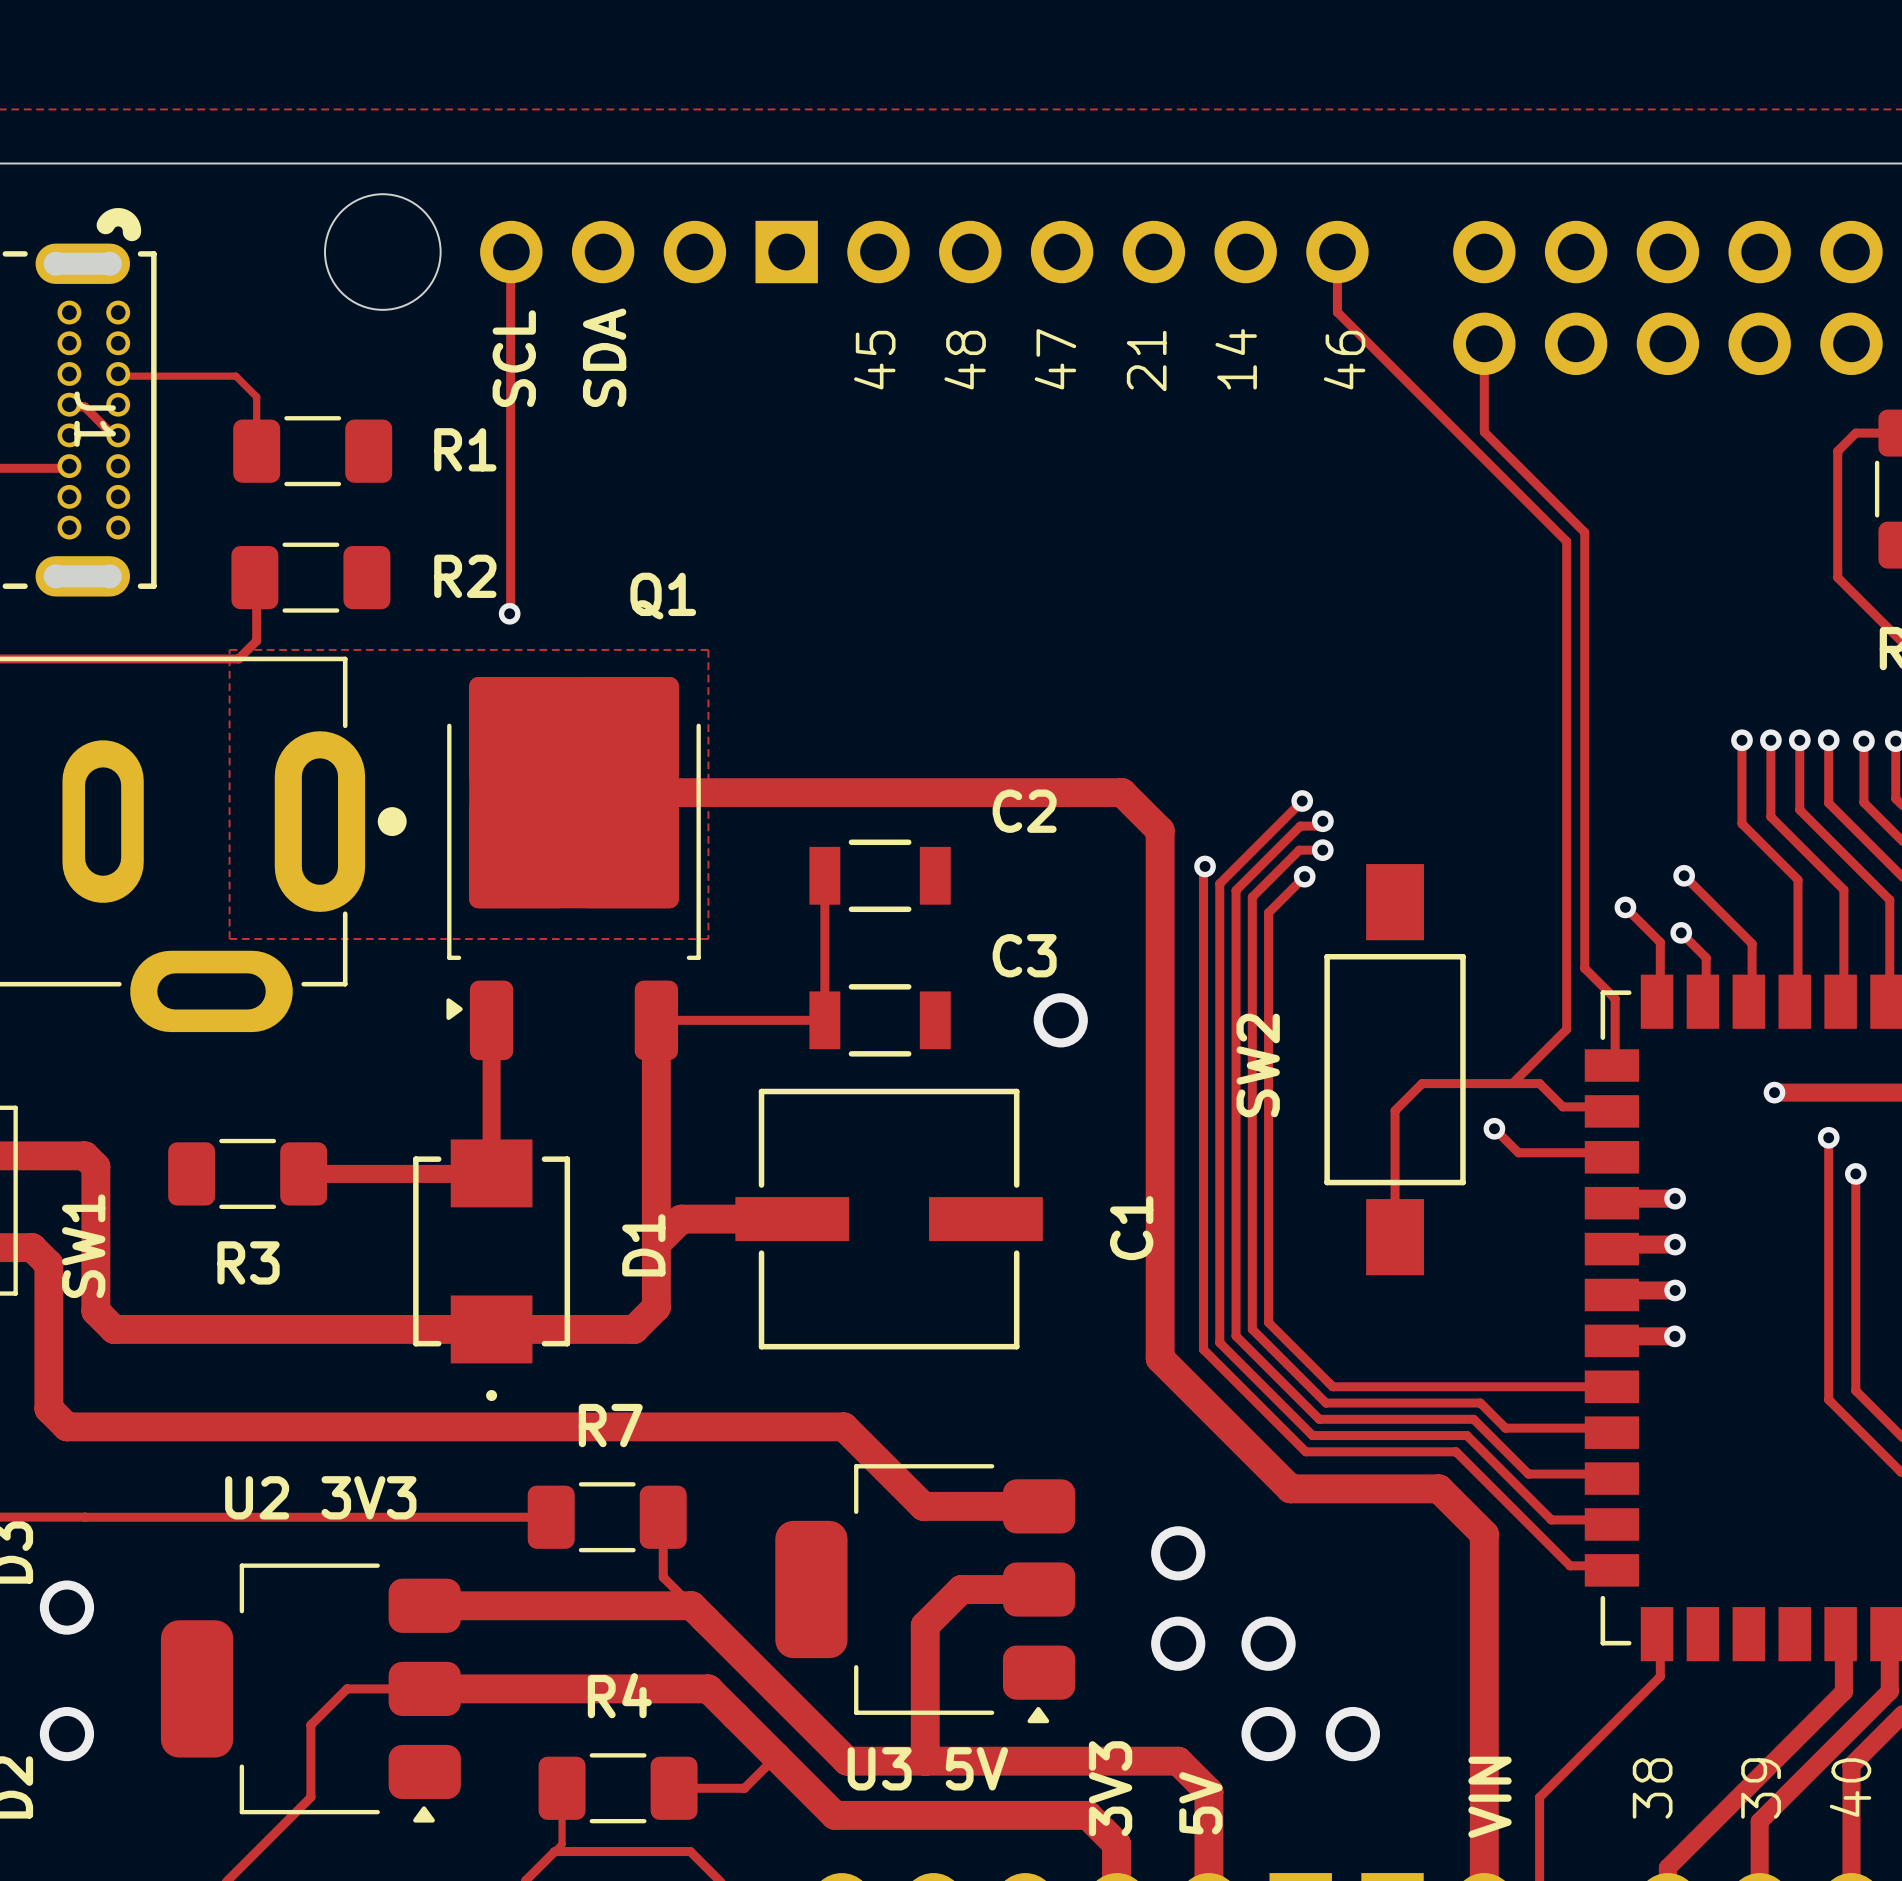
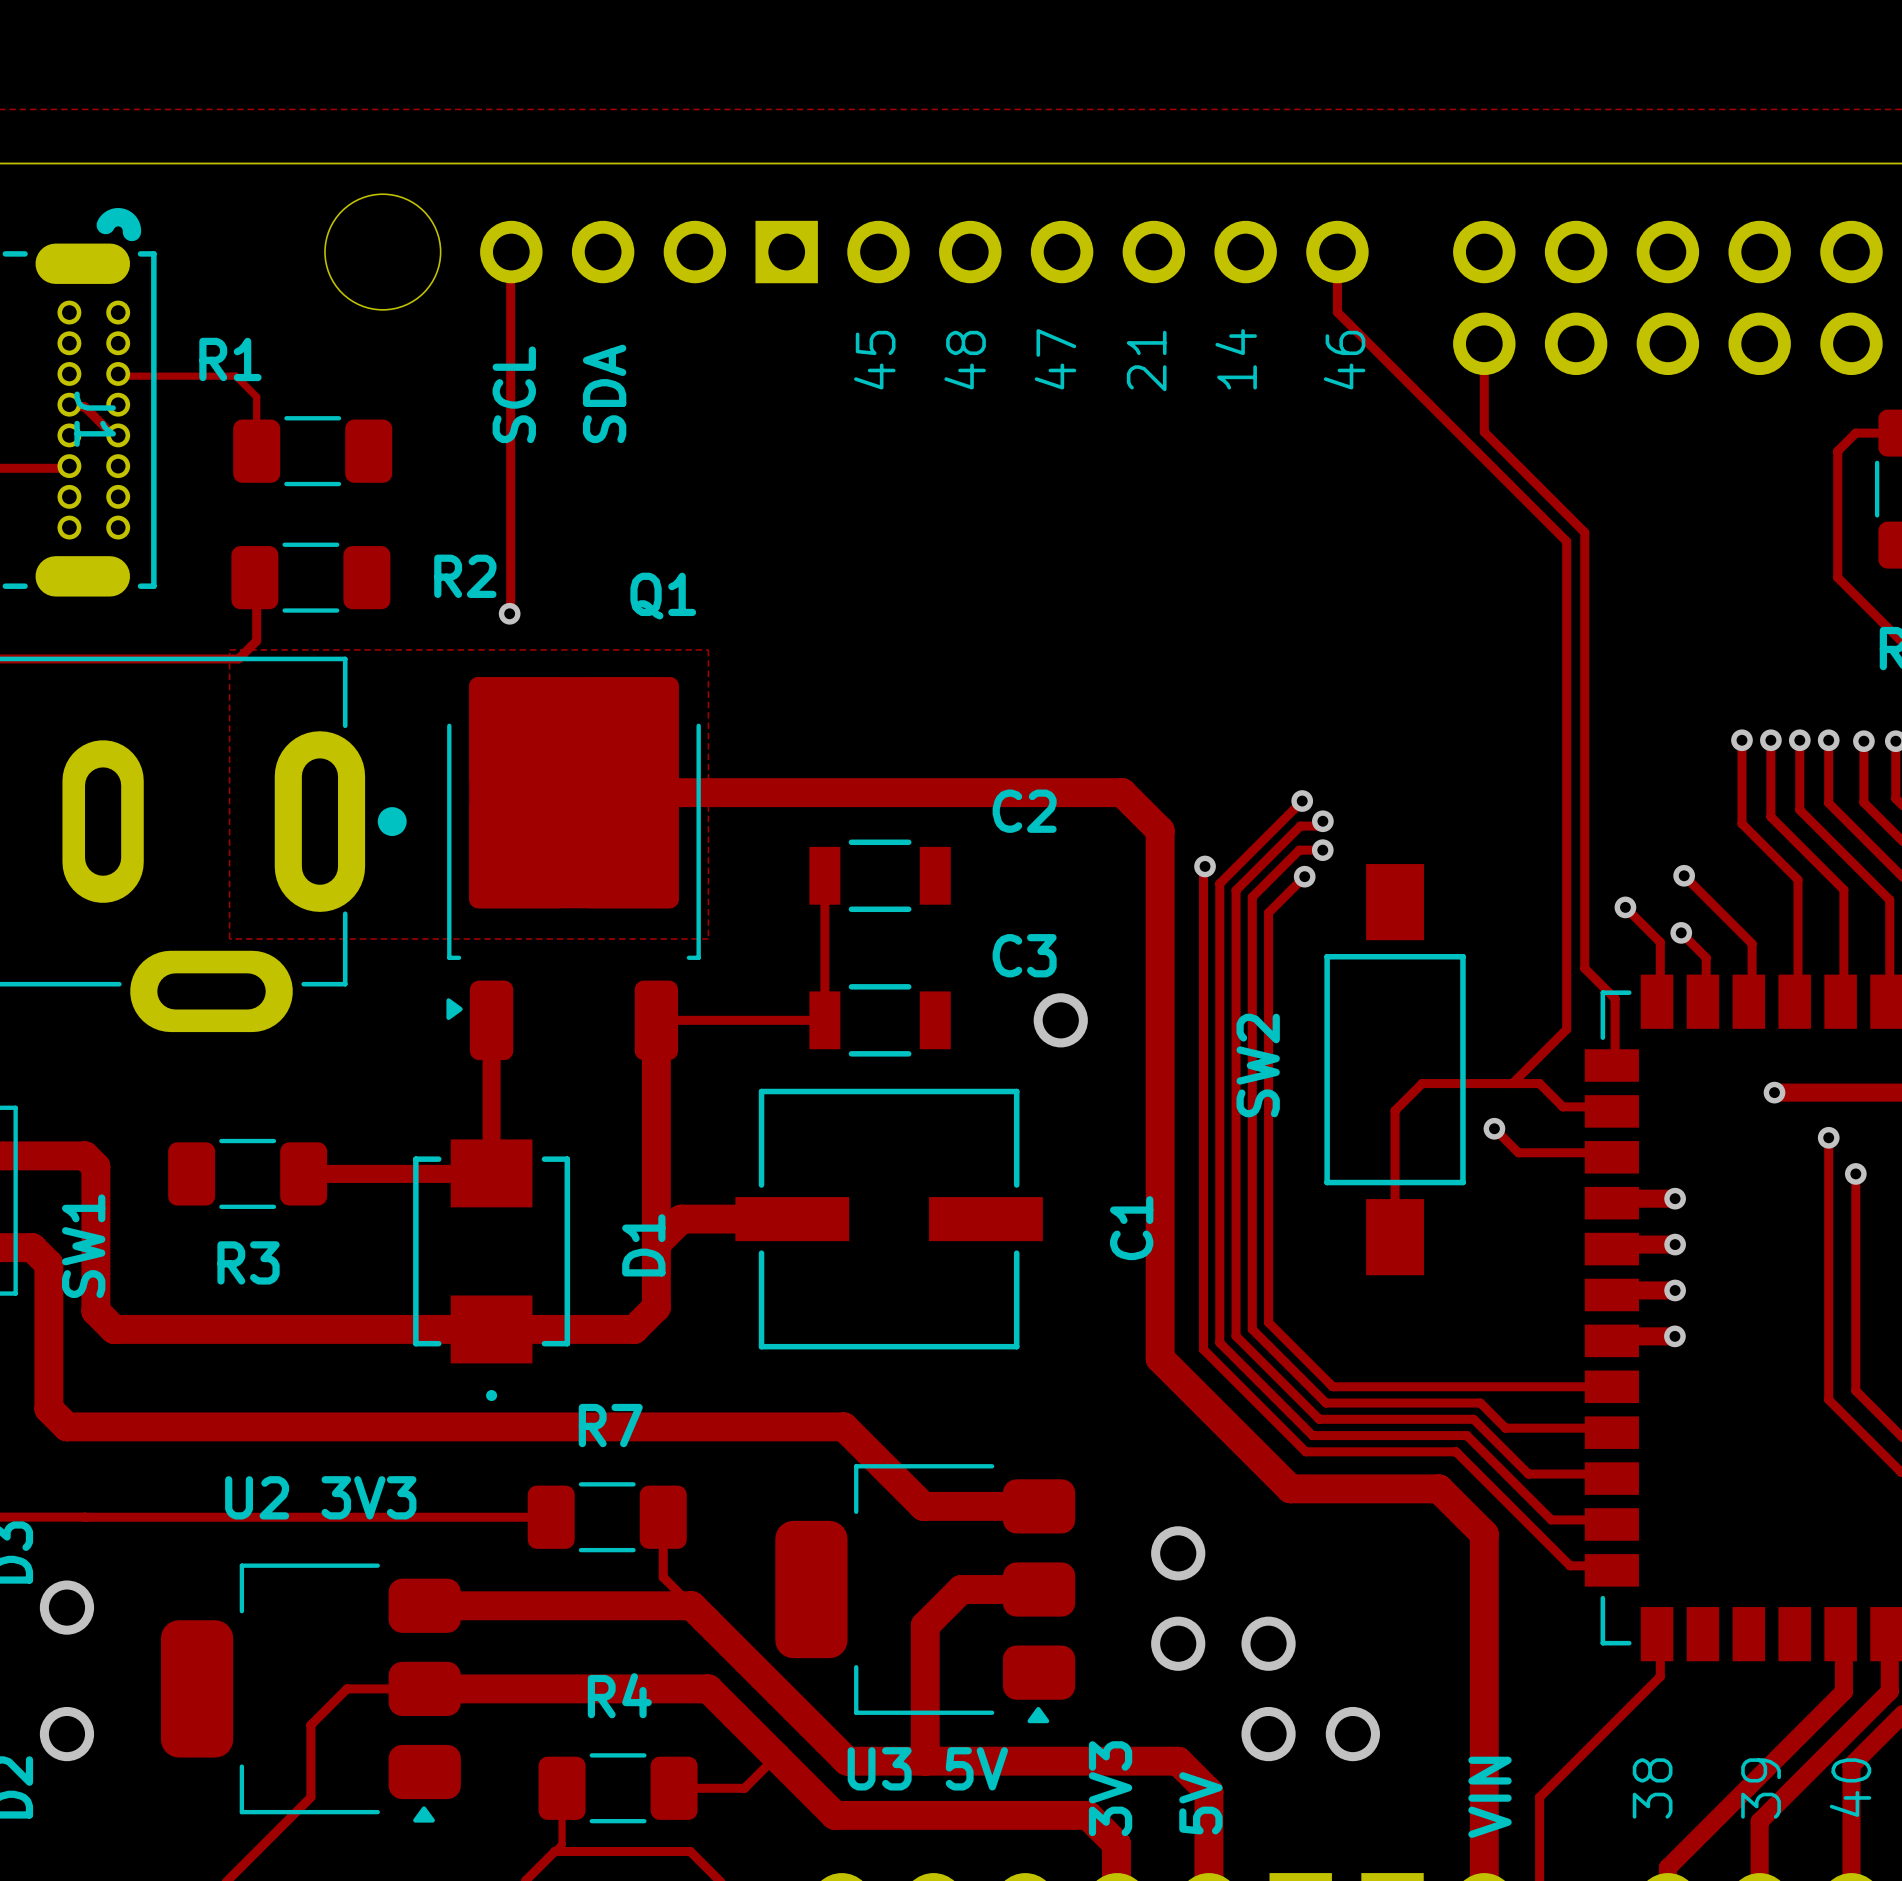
text position: SDA (604, 357) -> SDA (604, 393)
text position: SCL (514, 358) -> SCL (514, 394)
text position: R1 (465, 449) -> R1 (230, 359)

